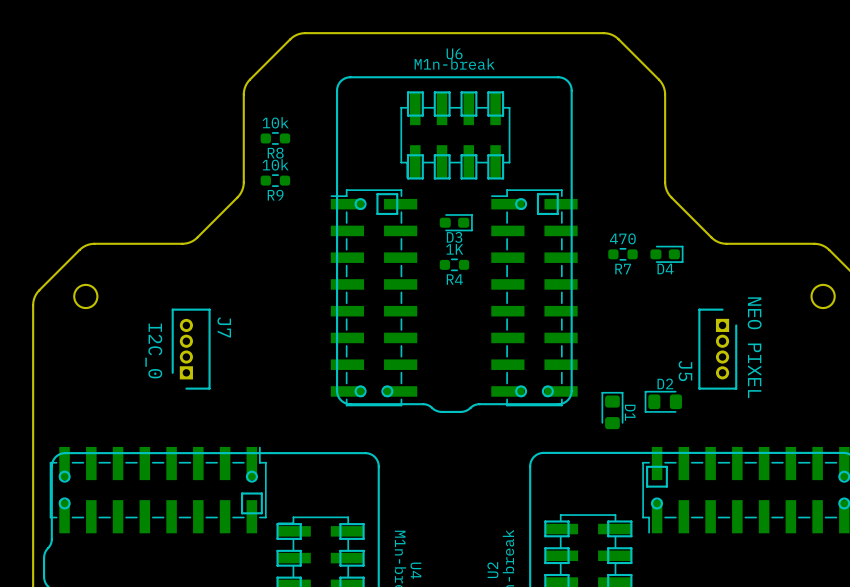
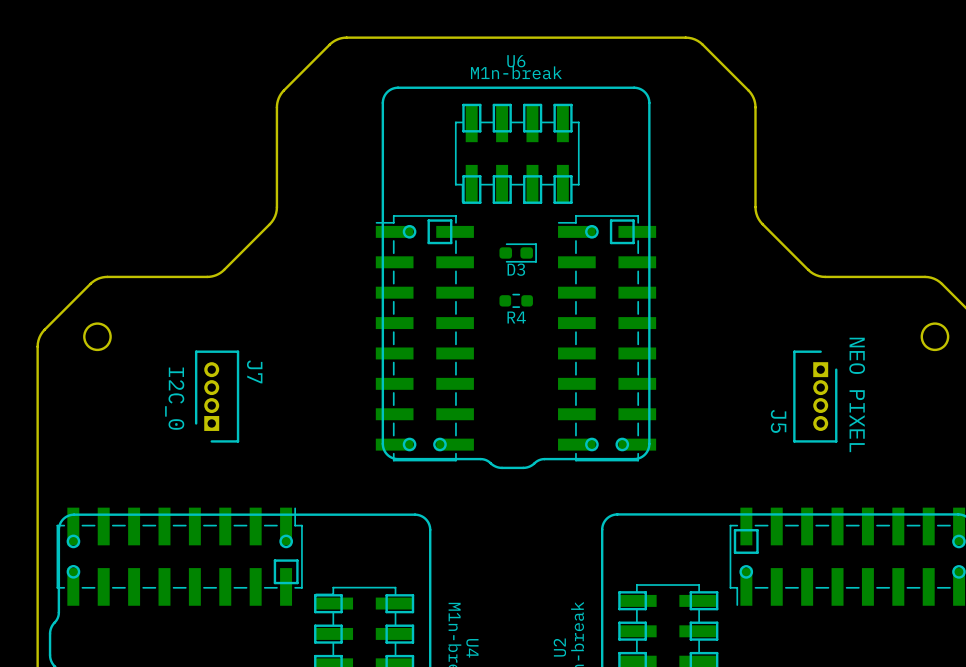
R8: 10k (275, 138) -> none
R9: 10k (275, 180) -> none
R4 value: 1K (454, 249) -> none
R7: 470 (622, 254) -> none
D4: (666, 254) -> none
D2: (663, 401) -> none
D1: (612, 410) -> none

